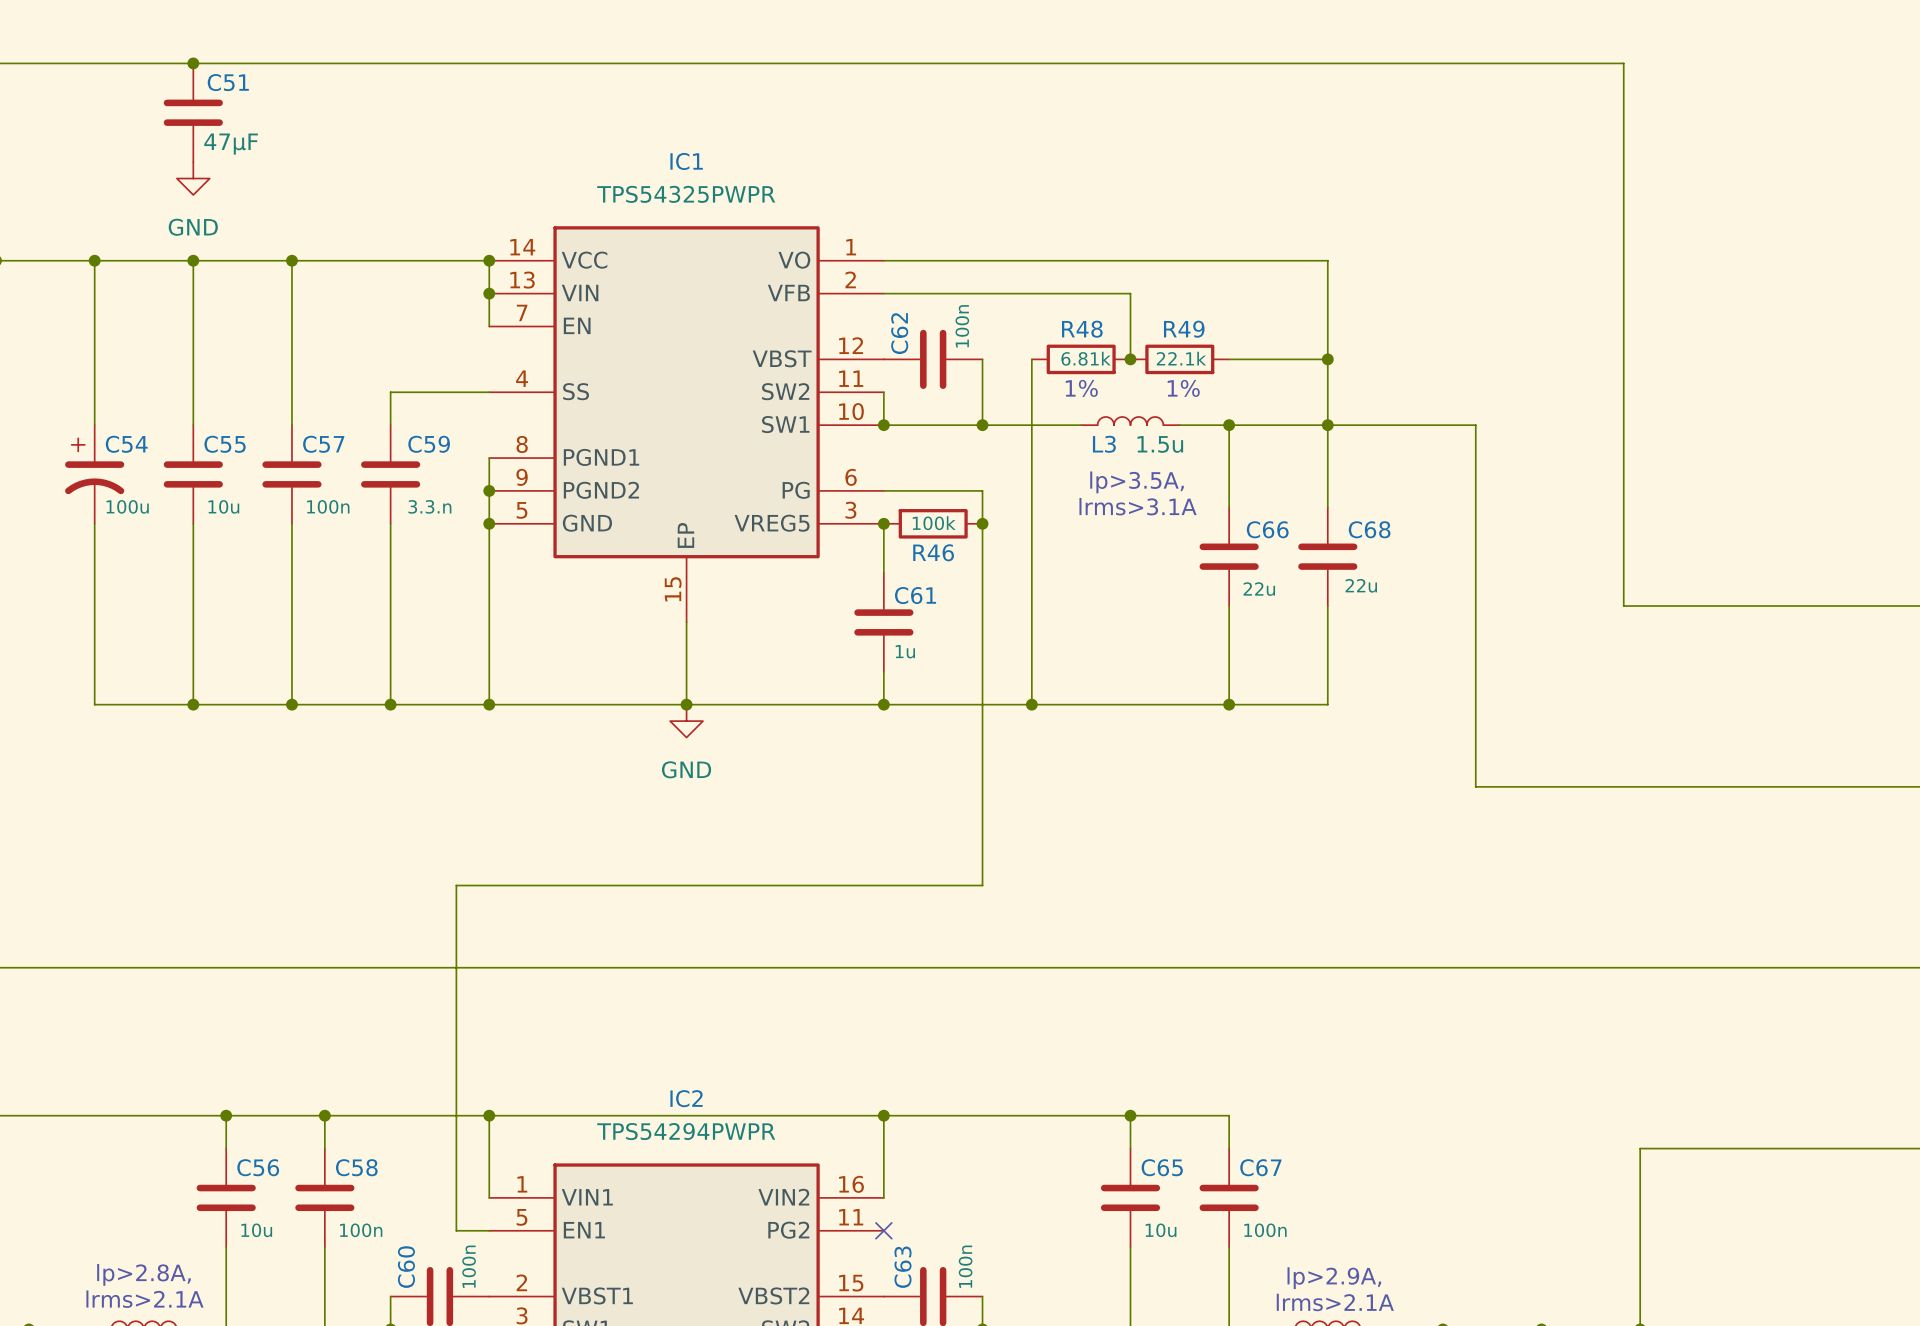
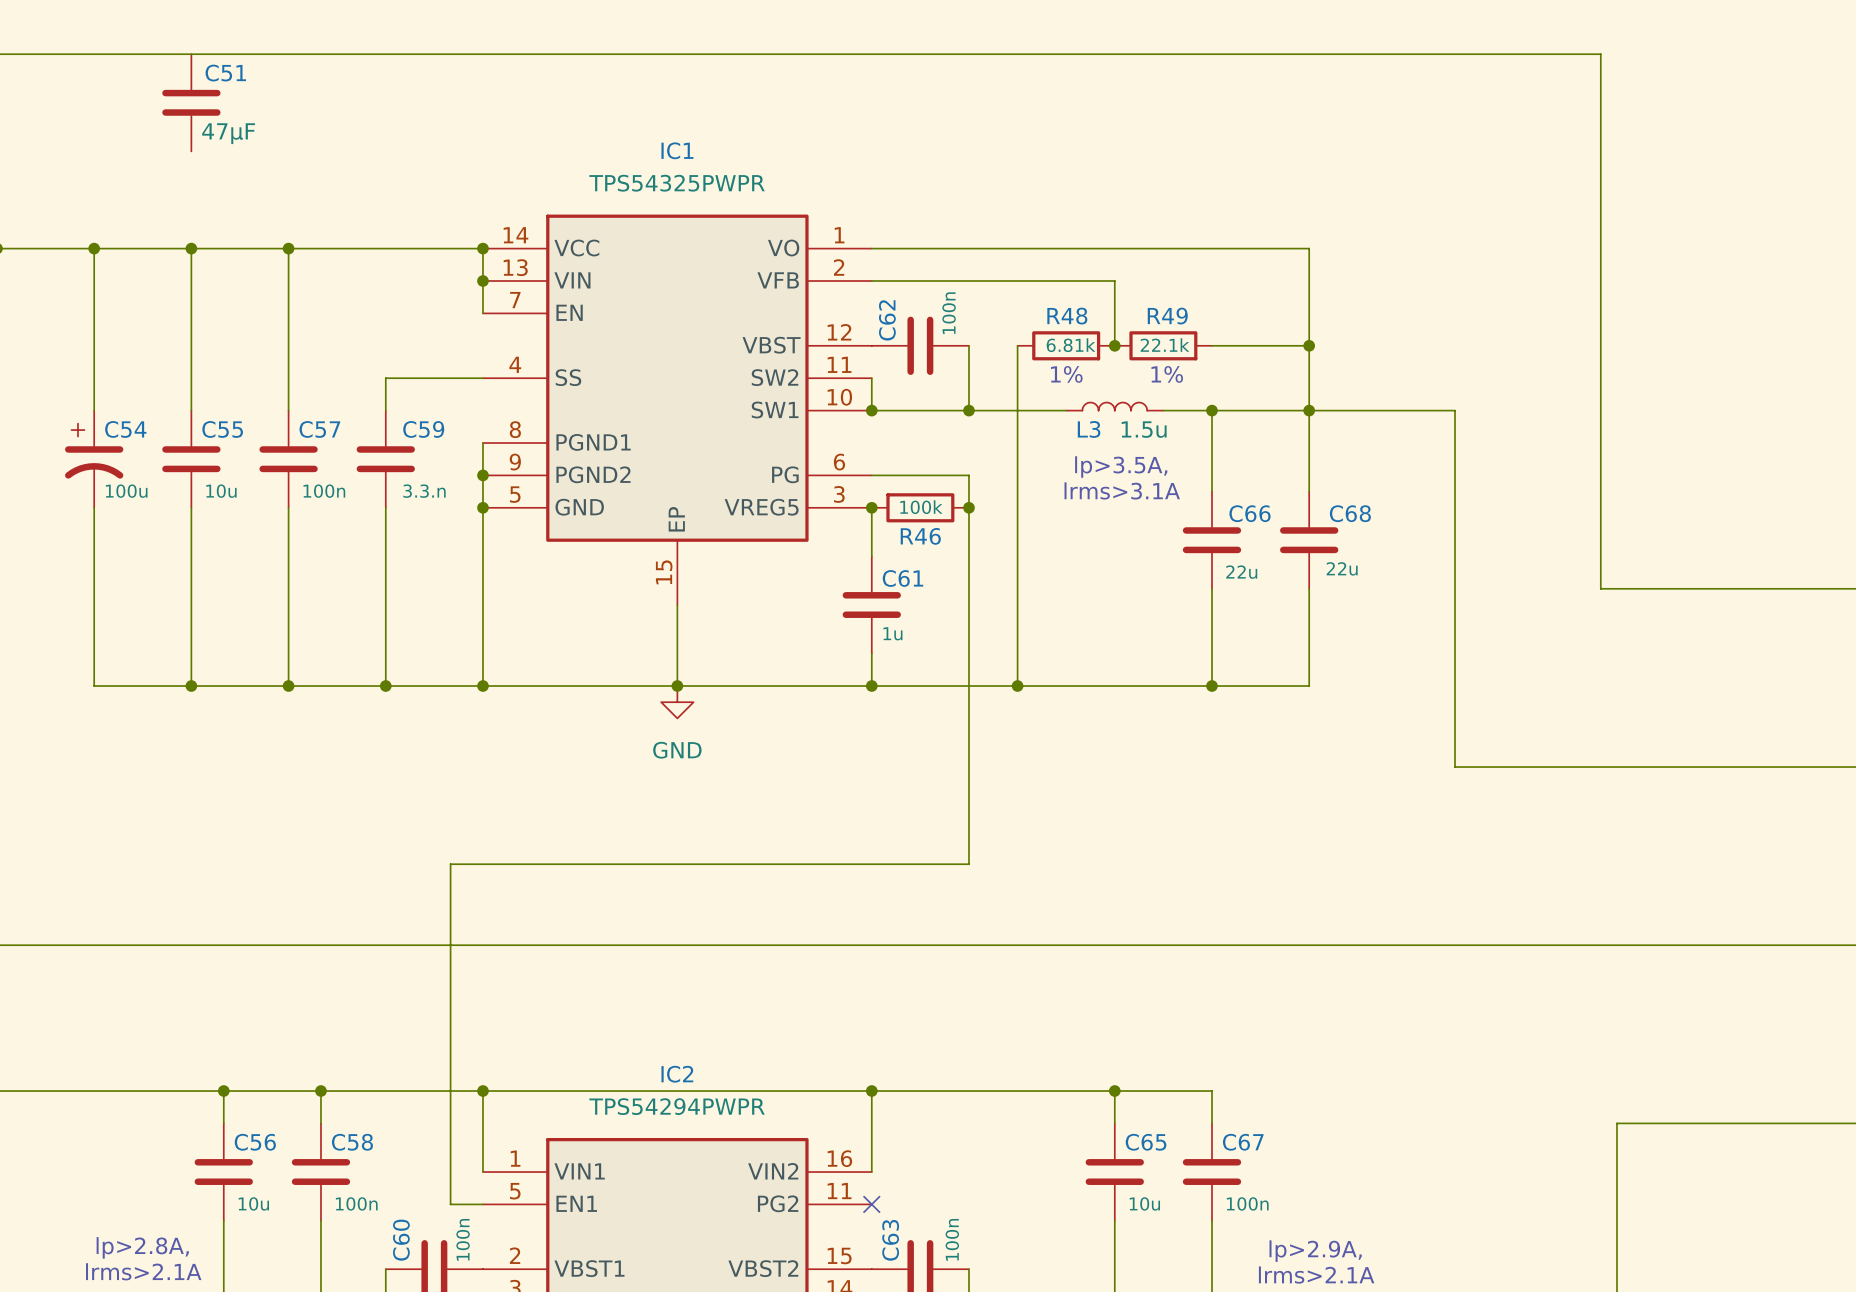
junction: (193, 63) -> none
power symbol: GND (193, 178) -> none

